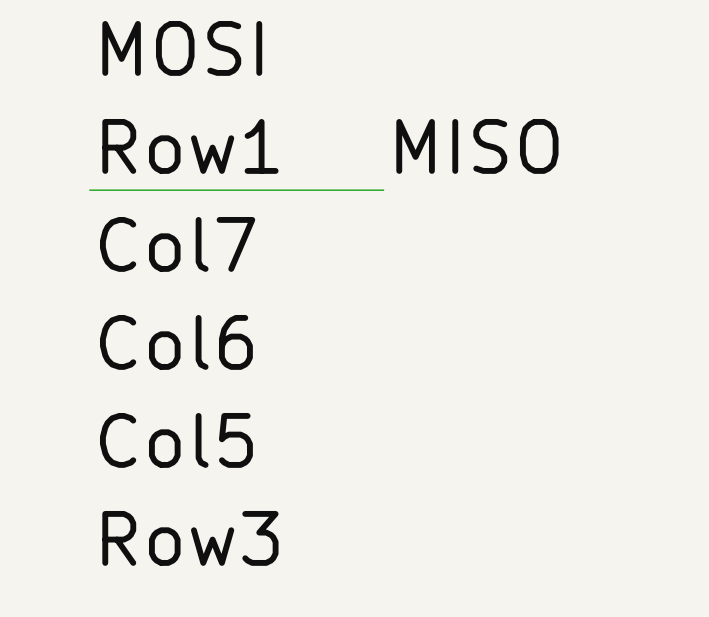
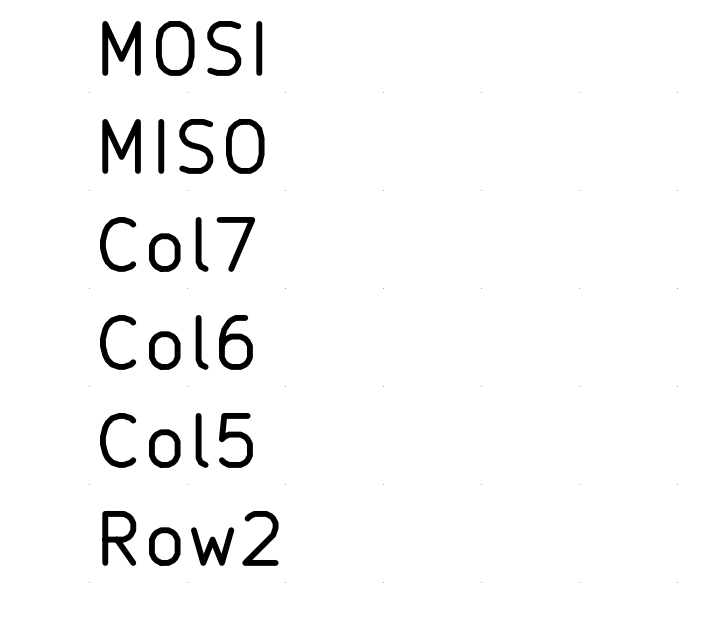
label: Row1 (190, 146) -> MISO (183, 146)
label: MISO (477, 146) -> none
wire: (89, 190) (383, 190) -> none
label: Row3 (190, 538) -> Row2 (190, 538)

